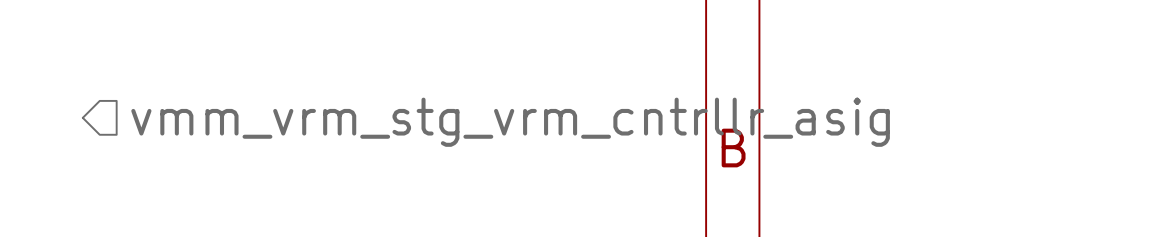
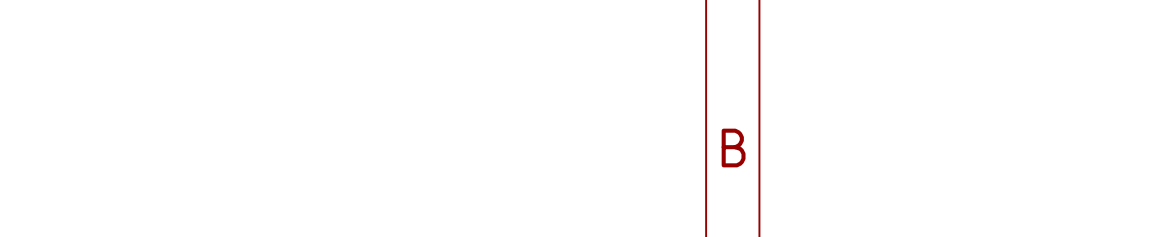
hierarchical label: vmm_vrm_stg_vrm_cntrllr_asig (510, 122) -> none

